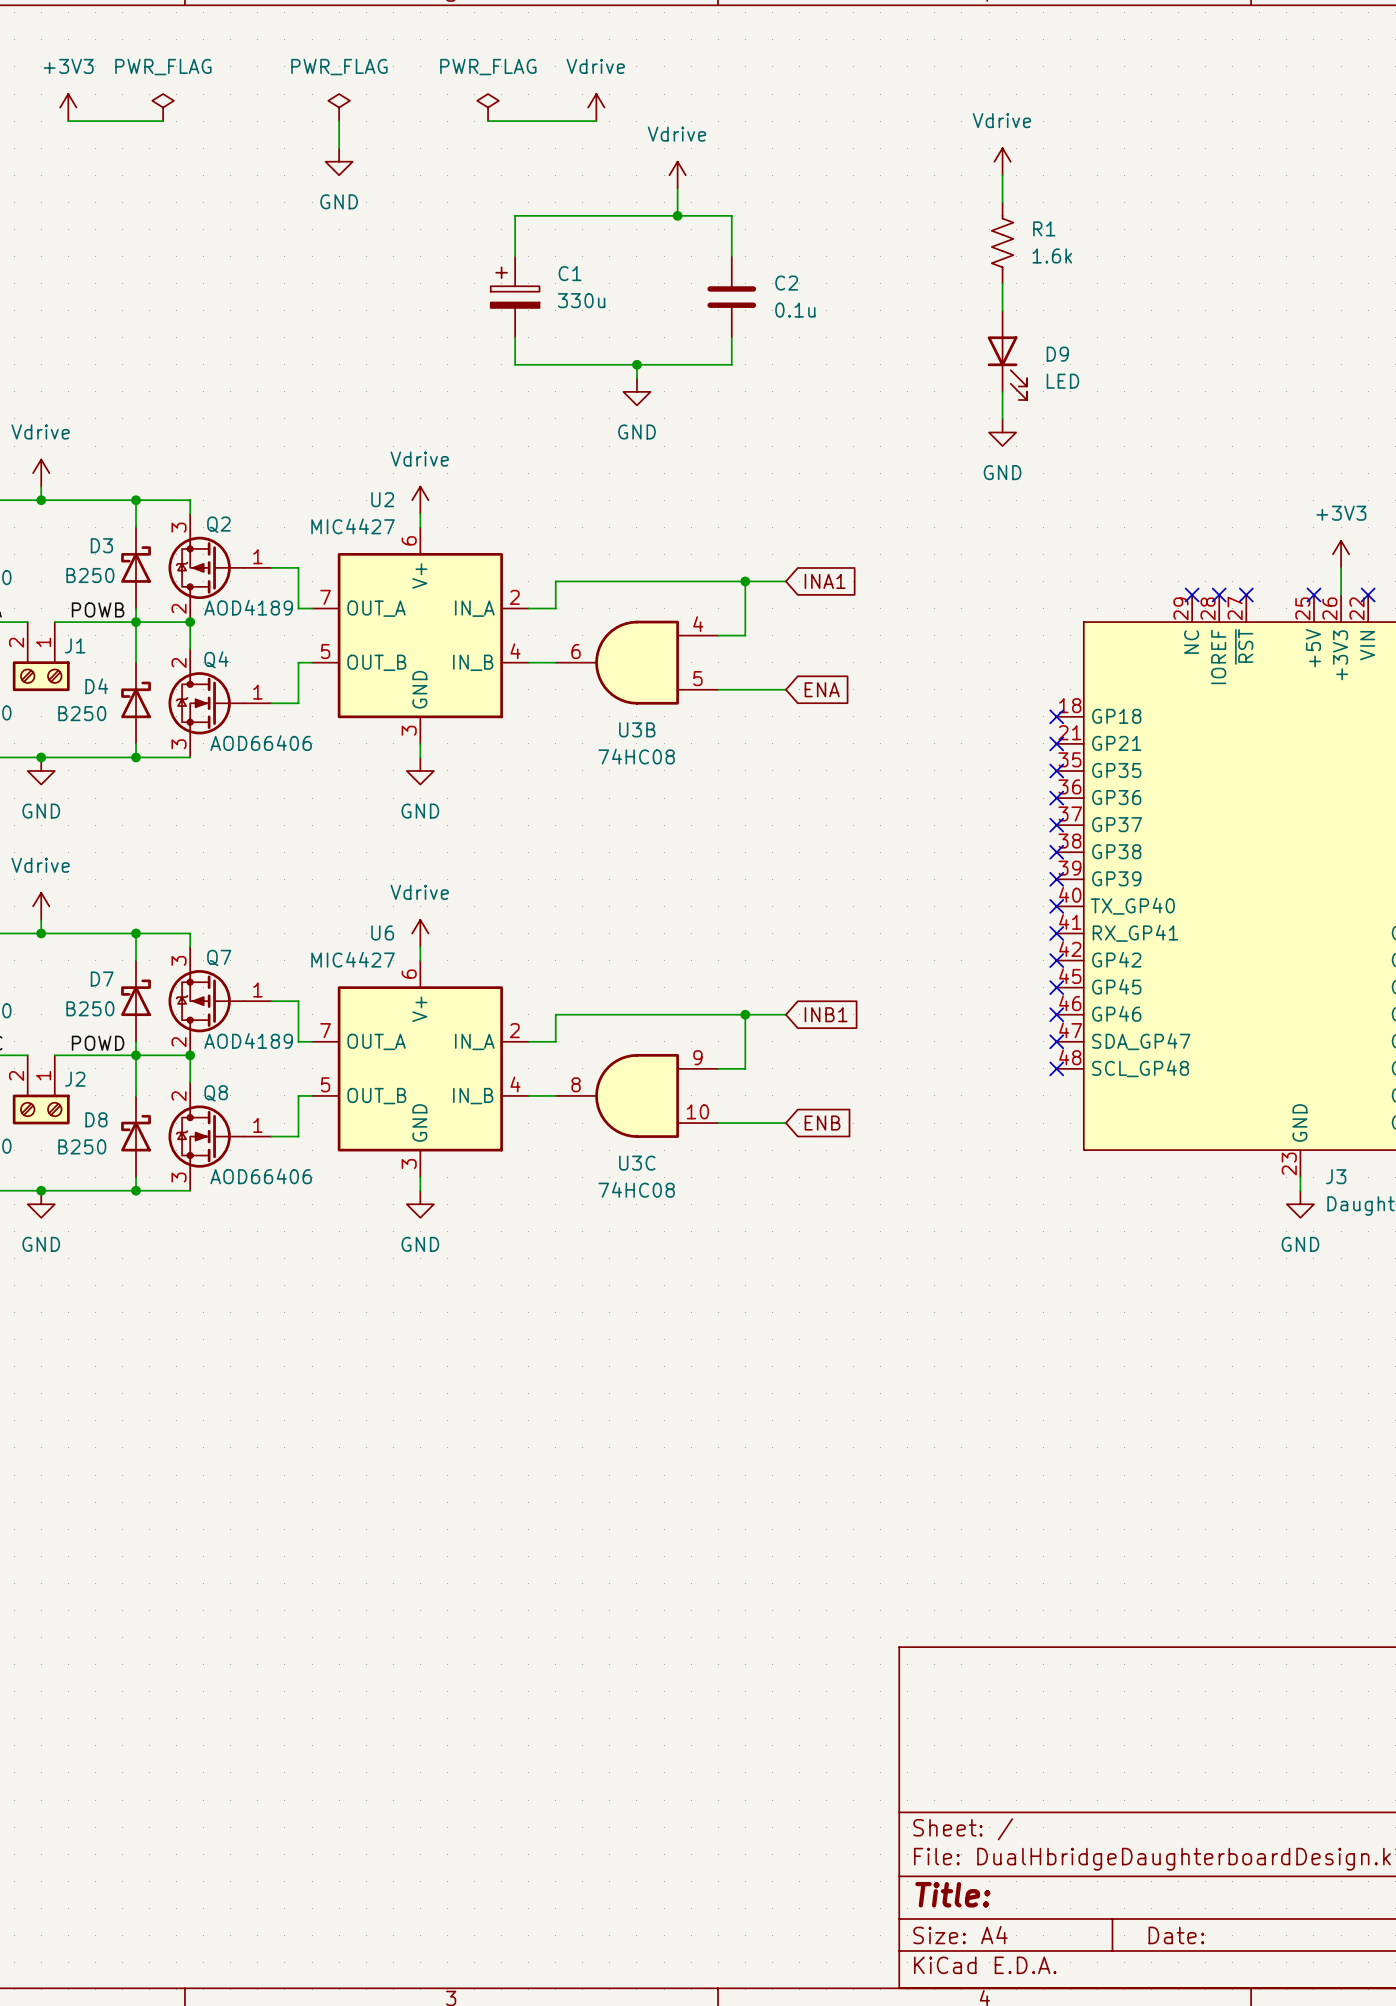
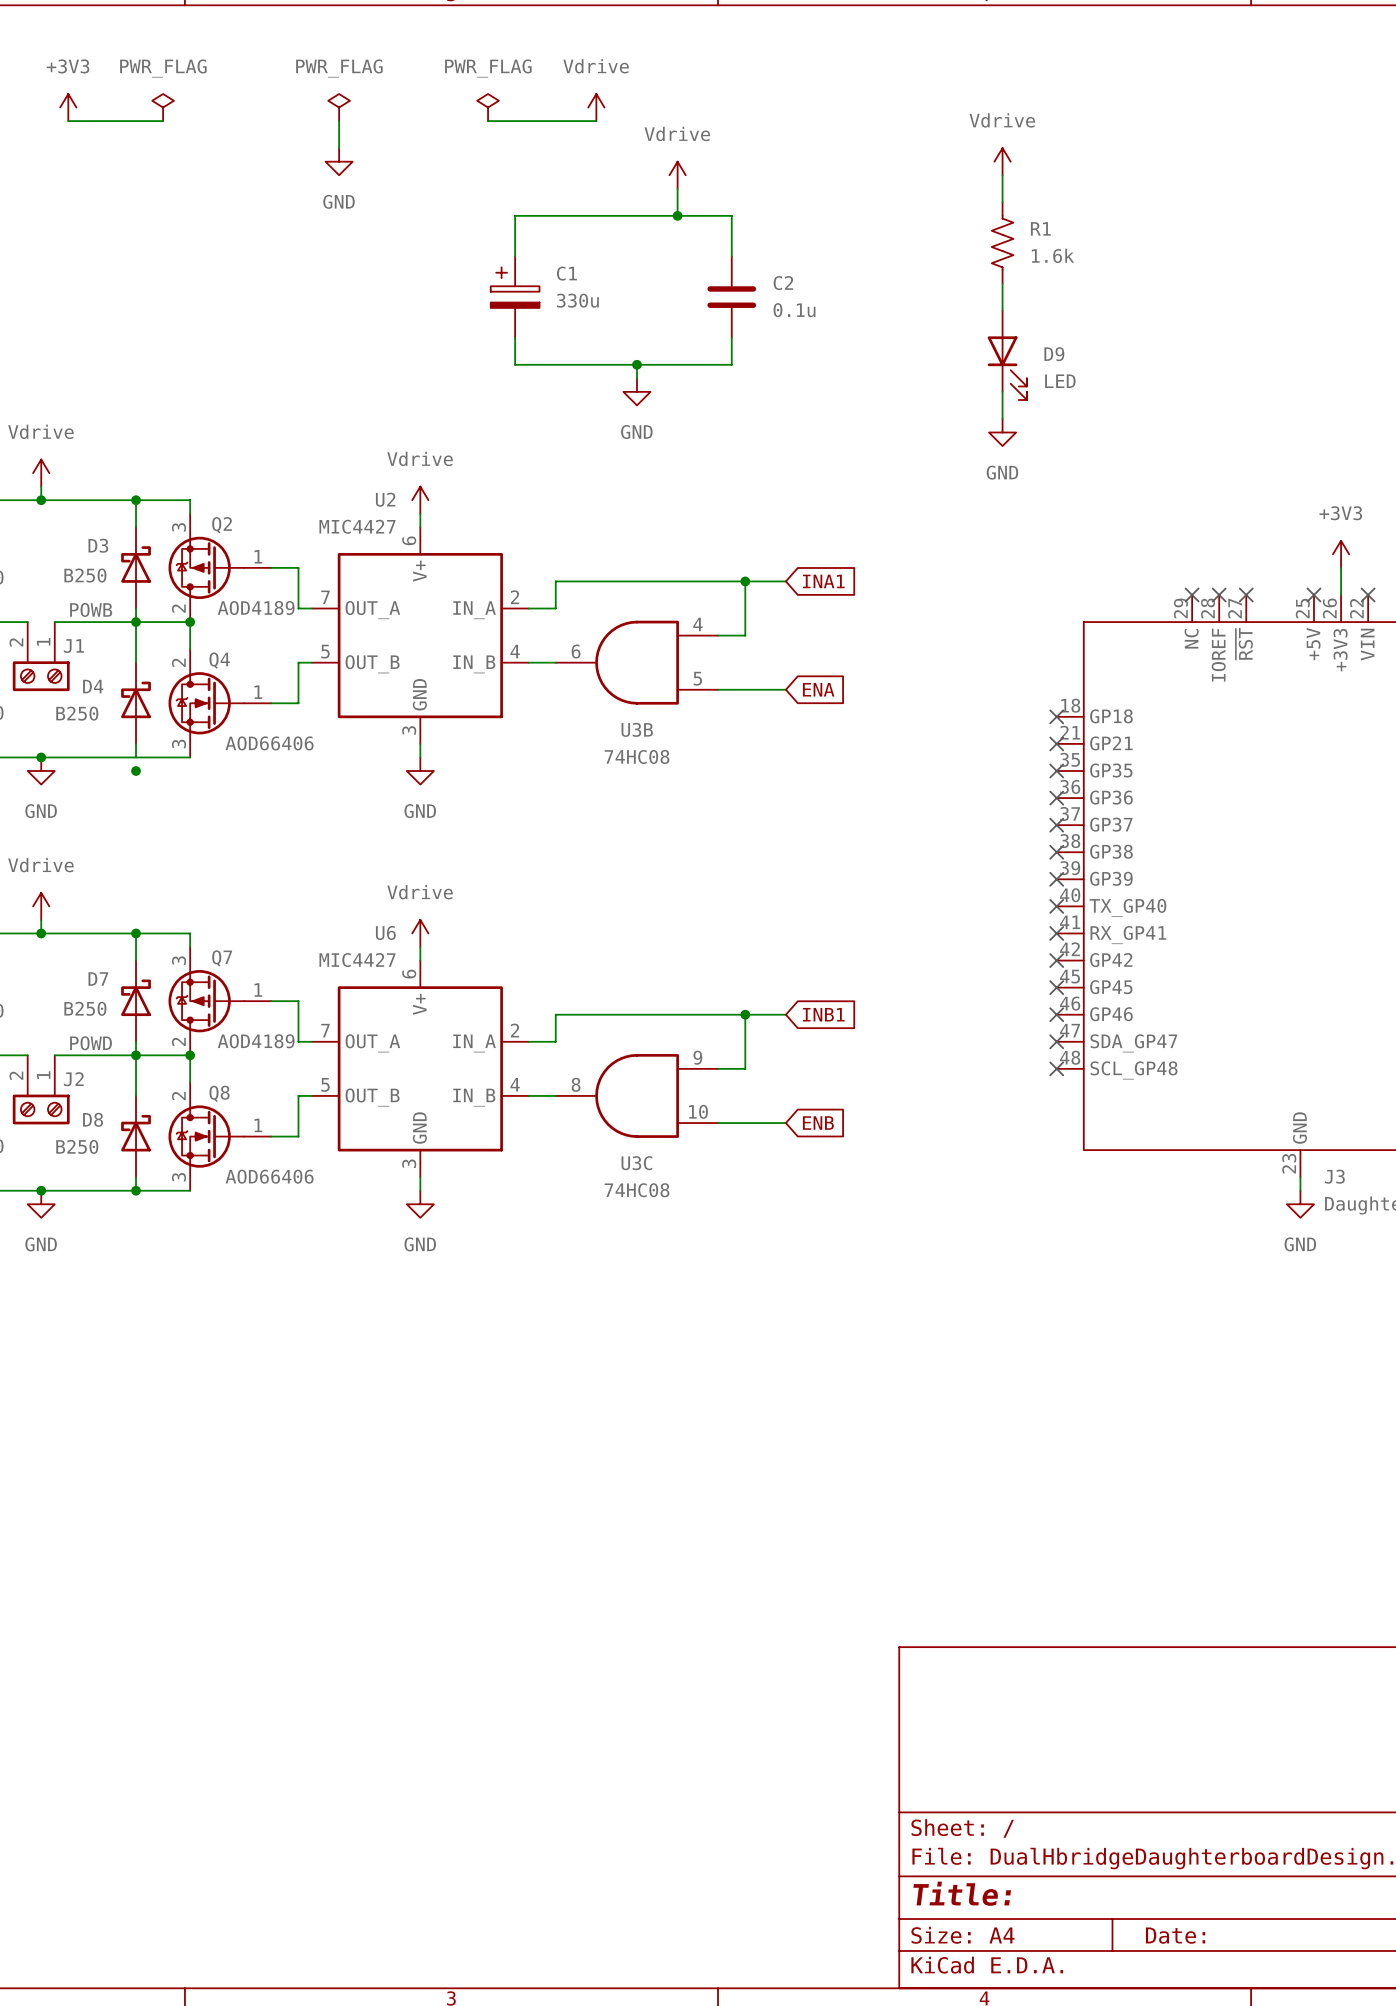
junction position: (136, 757) -> (136, 770)

